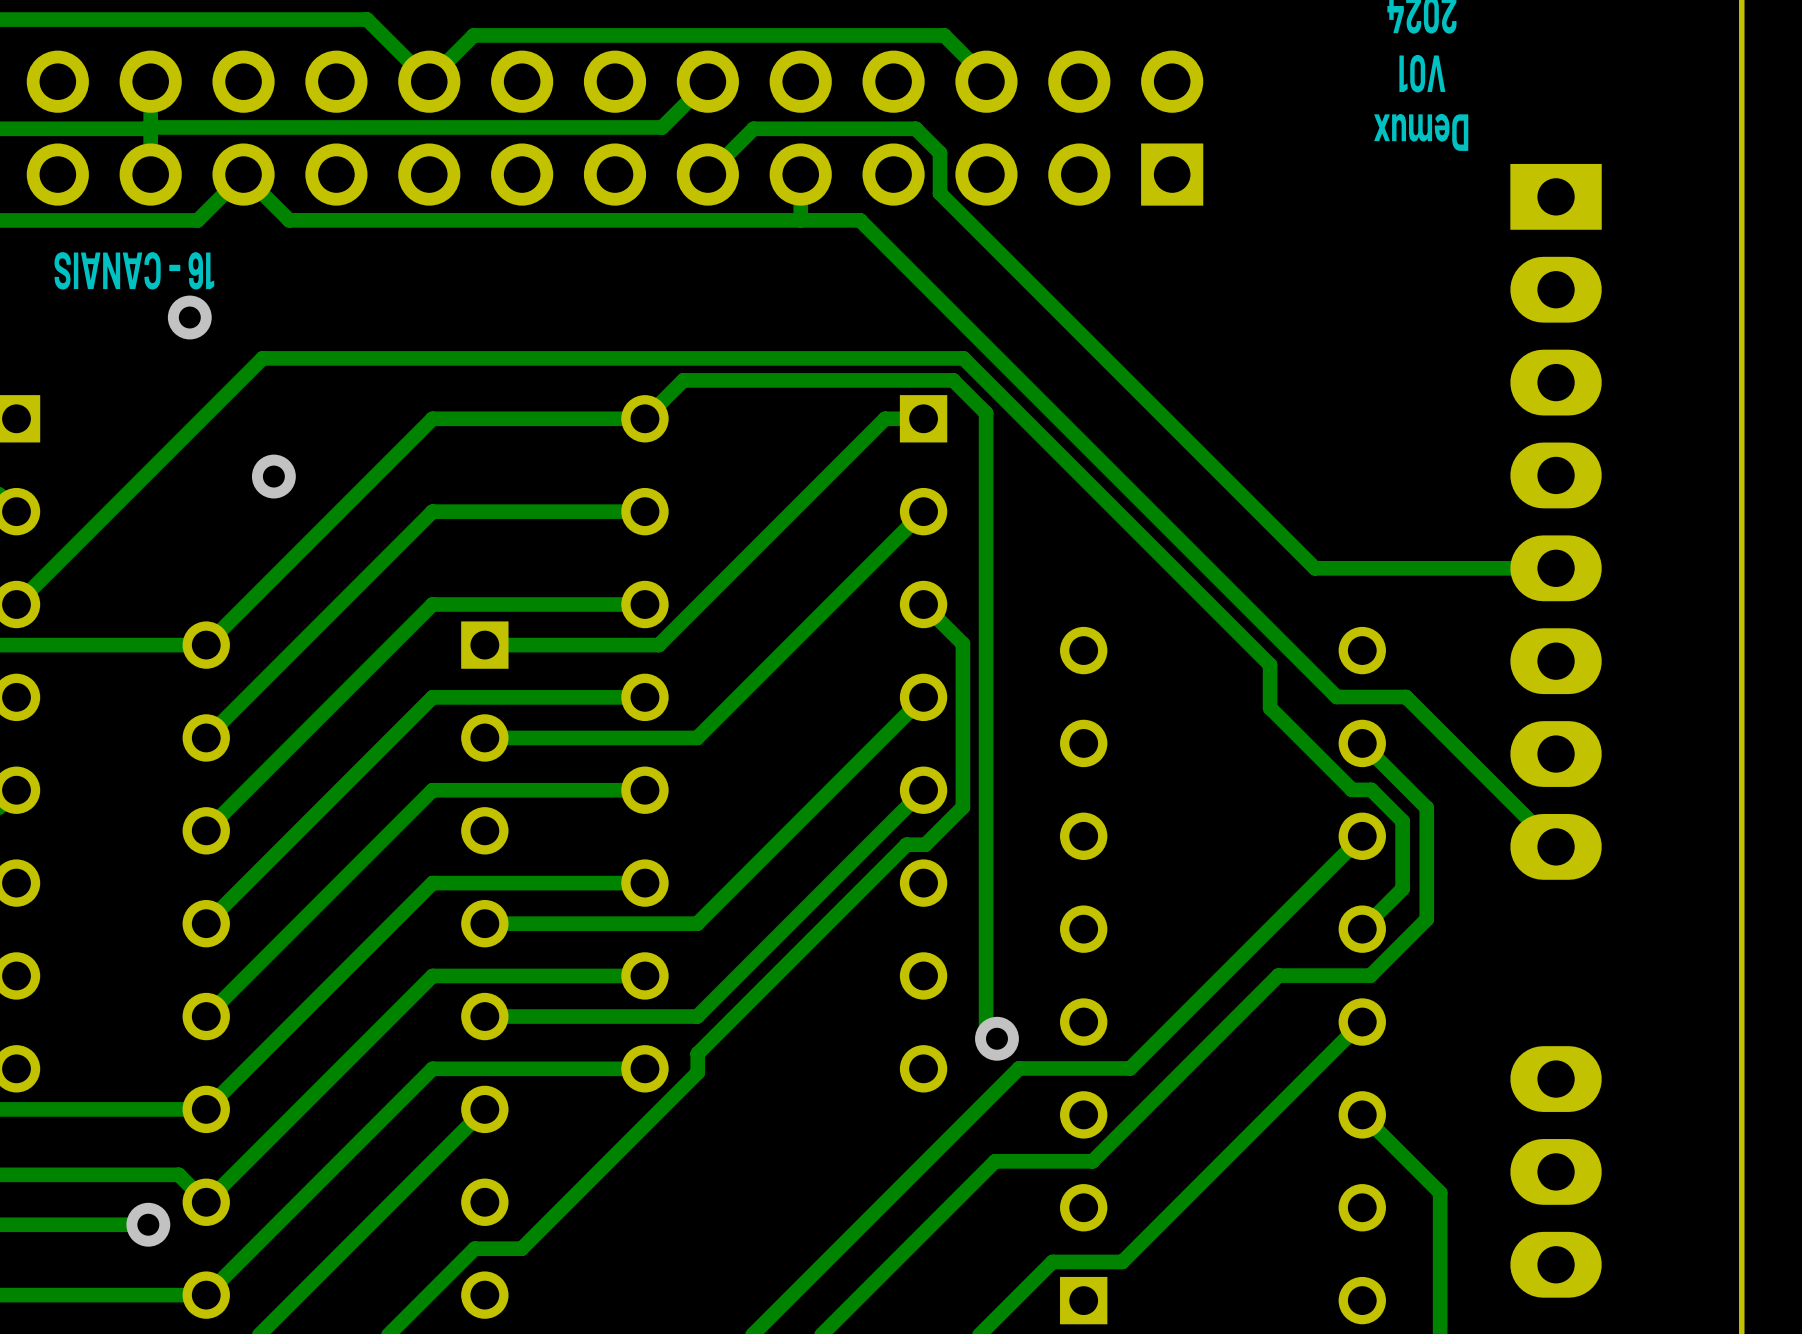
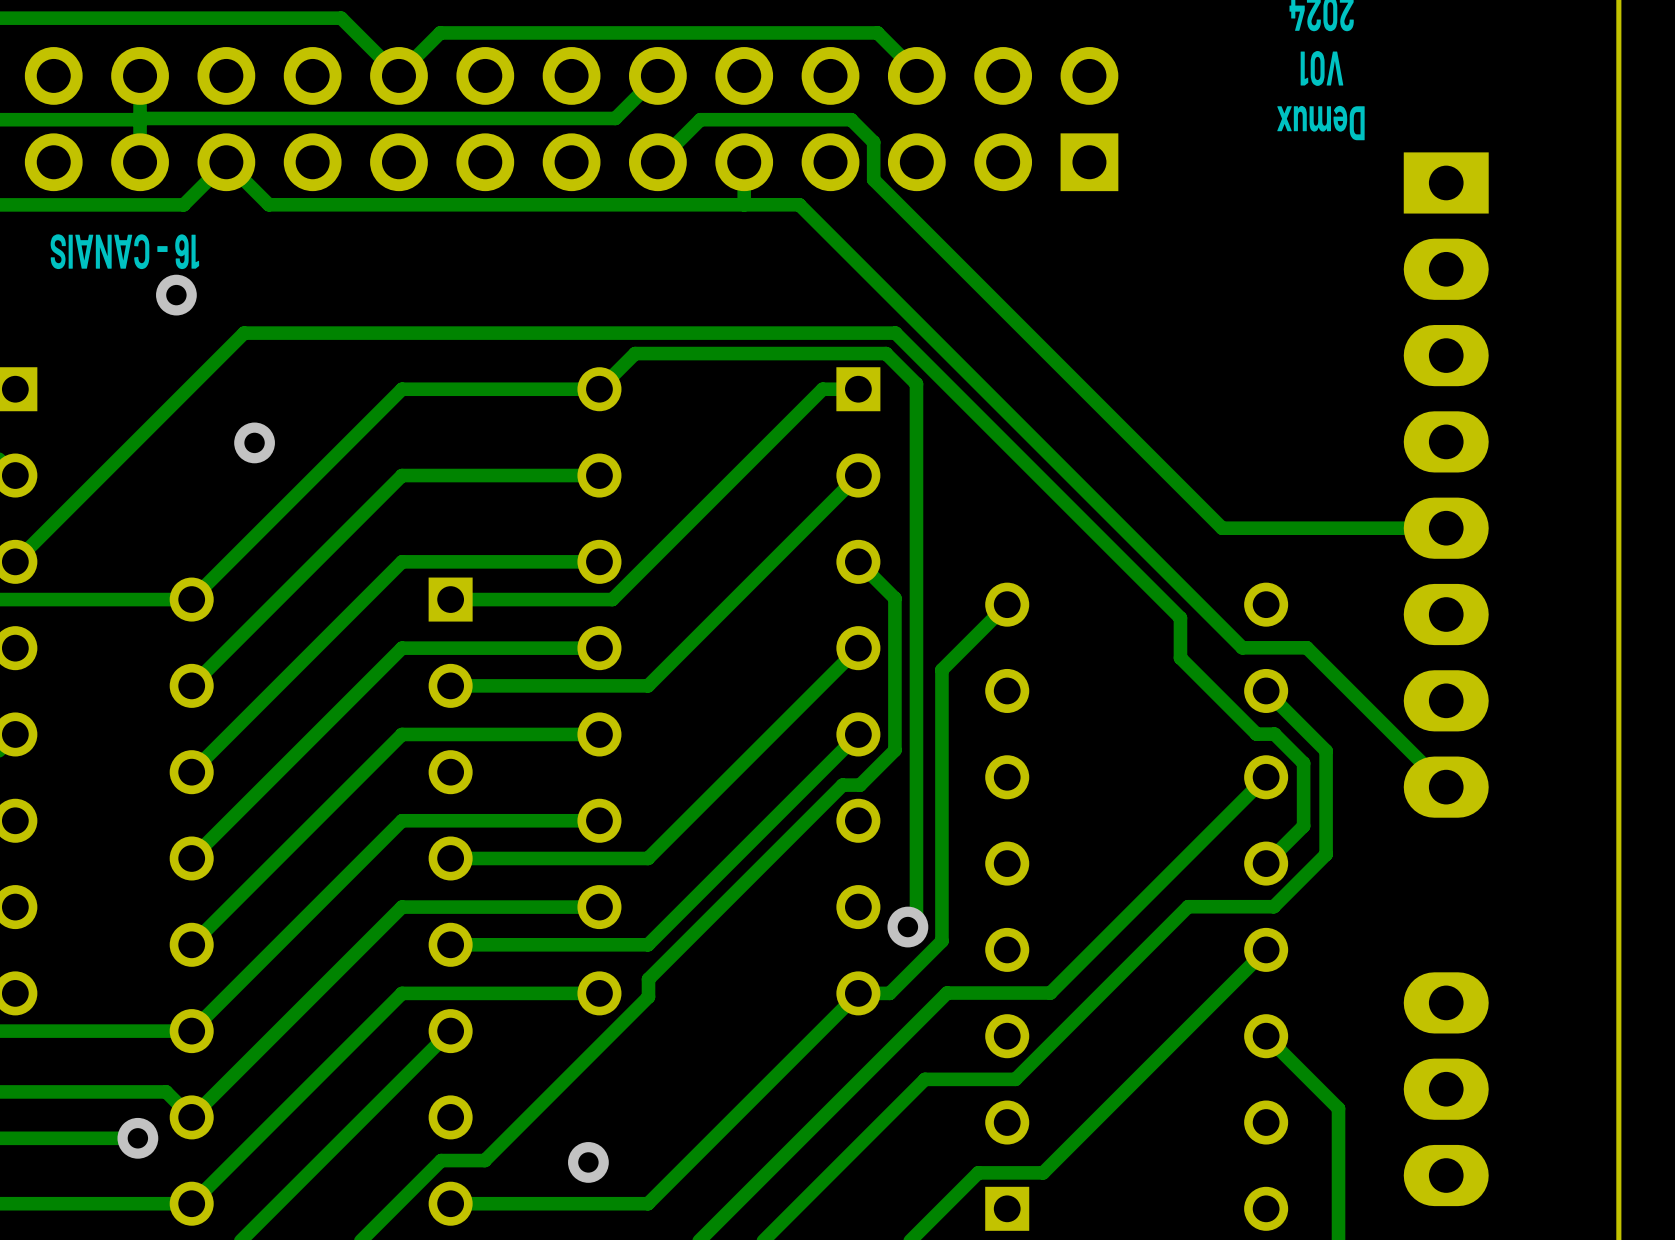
track: none -> (1007, 604) (941, 669) (941, 941) (889, 993) (858, 993) (648, 1203) (450, 1203)
via position: (996, 1038) -> (907, 927)
via: none -> (588, 1162)

